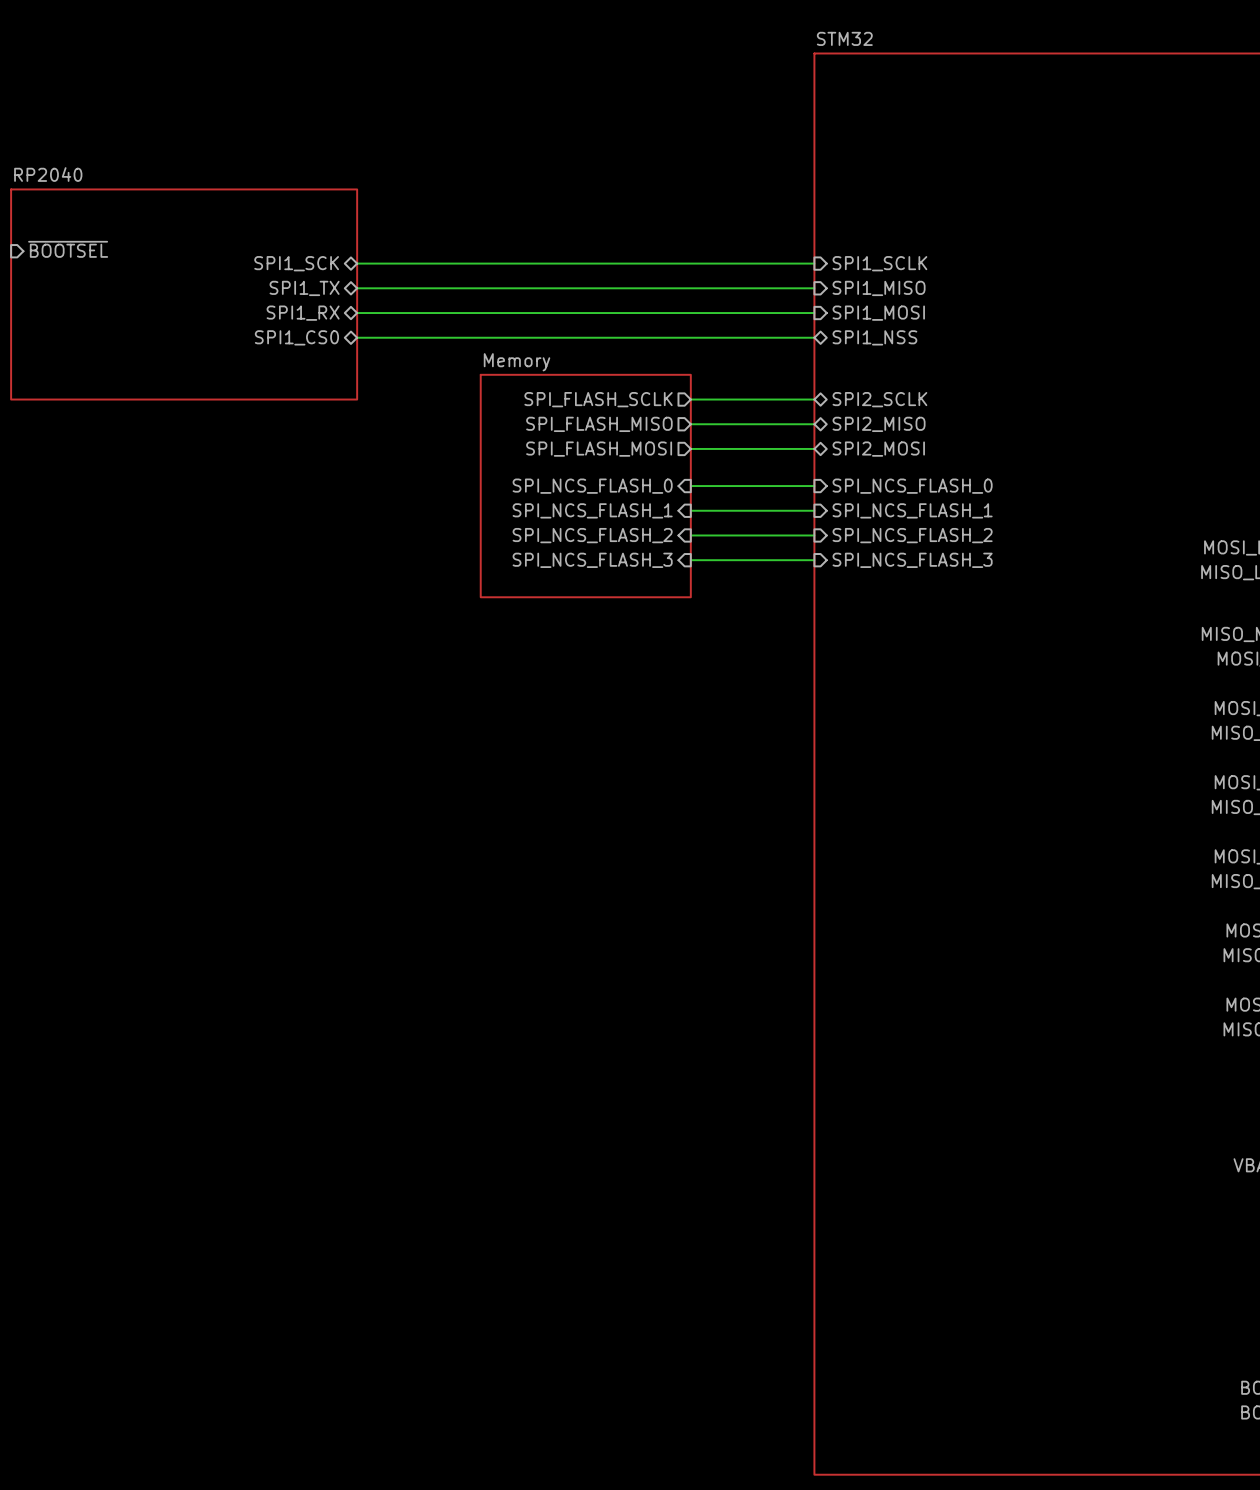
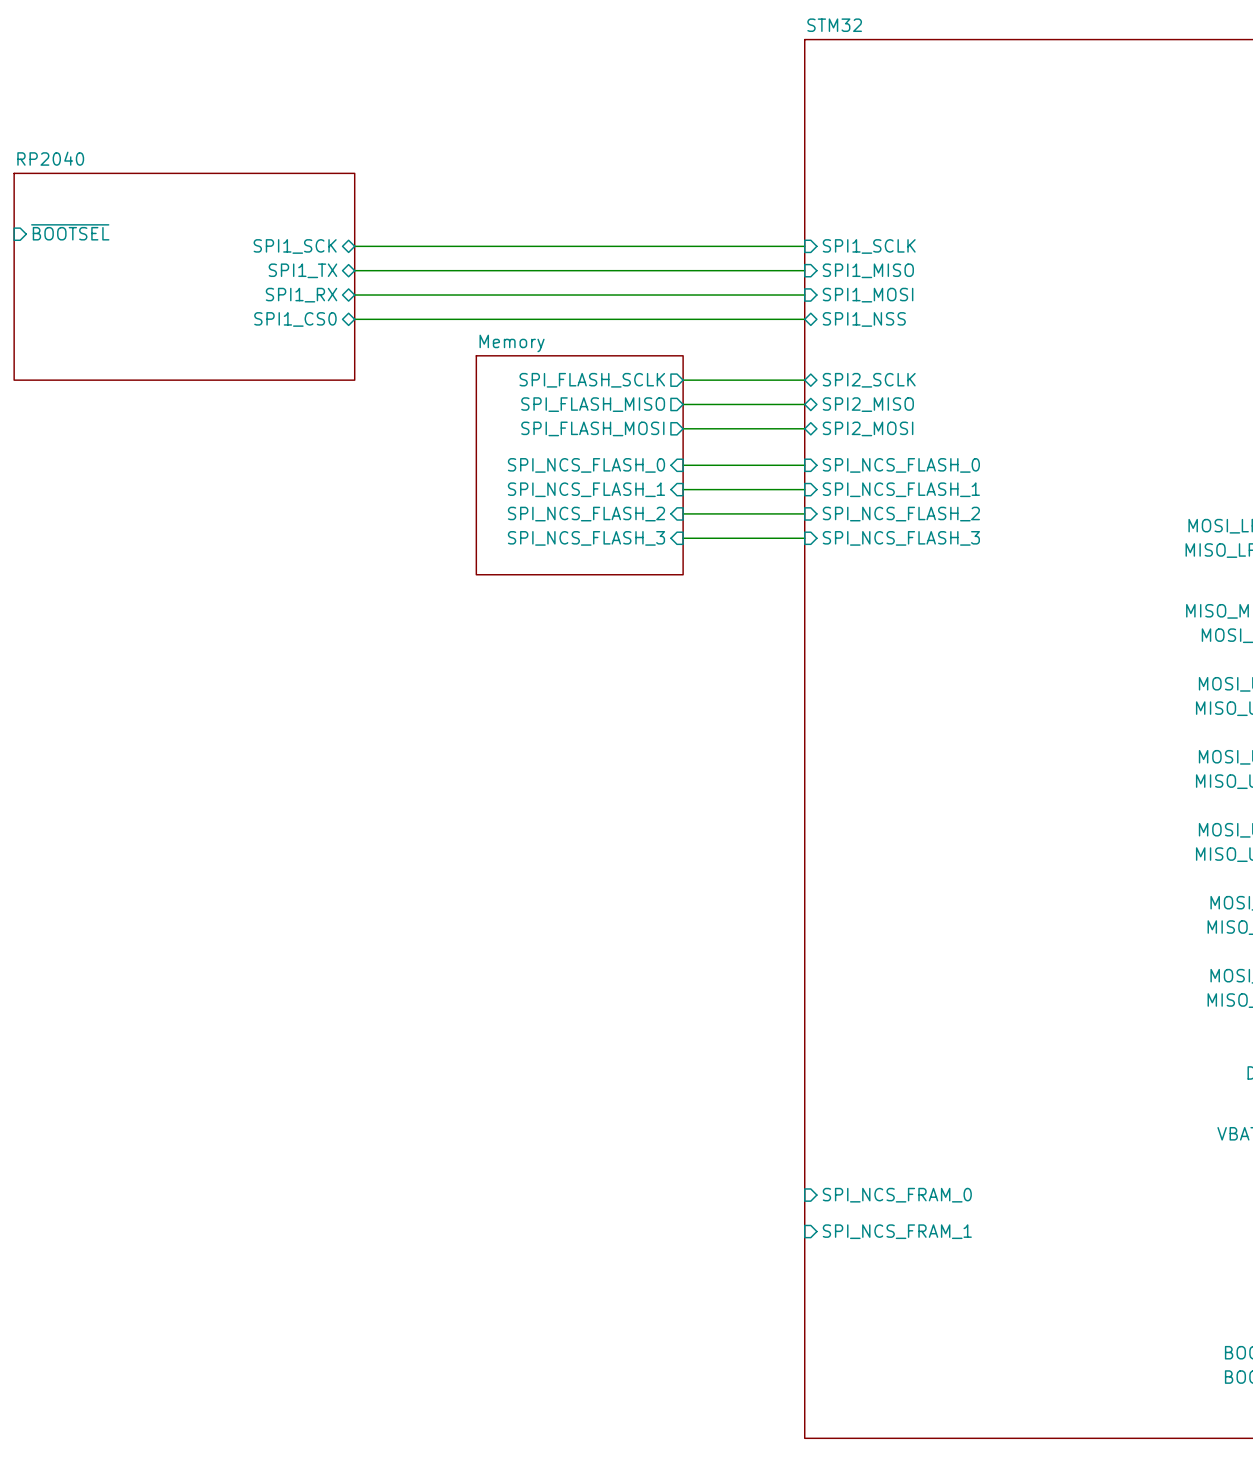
sheet pin: none -> SPI_NCS_FRAM_0 (897, 1195)
sheet pin: none -> SPI_NCS_FRAM_1 (897, 1231)

